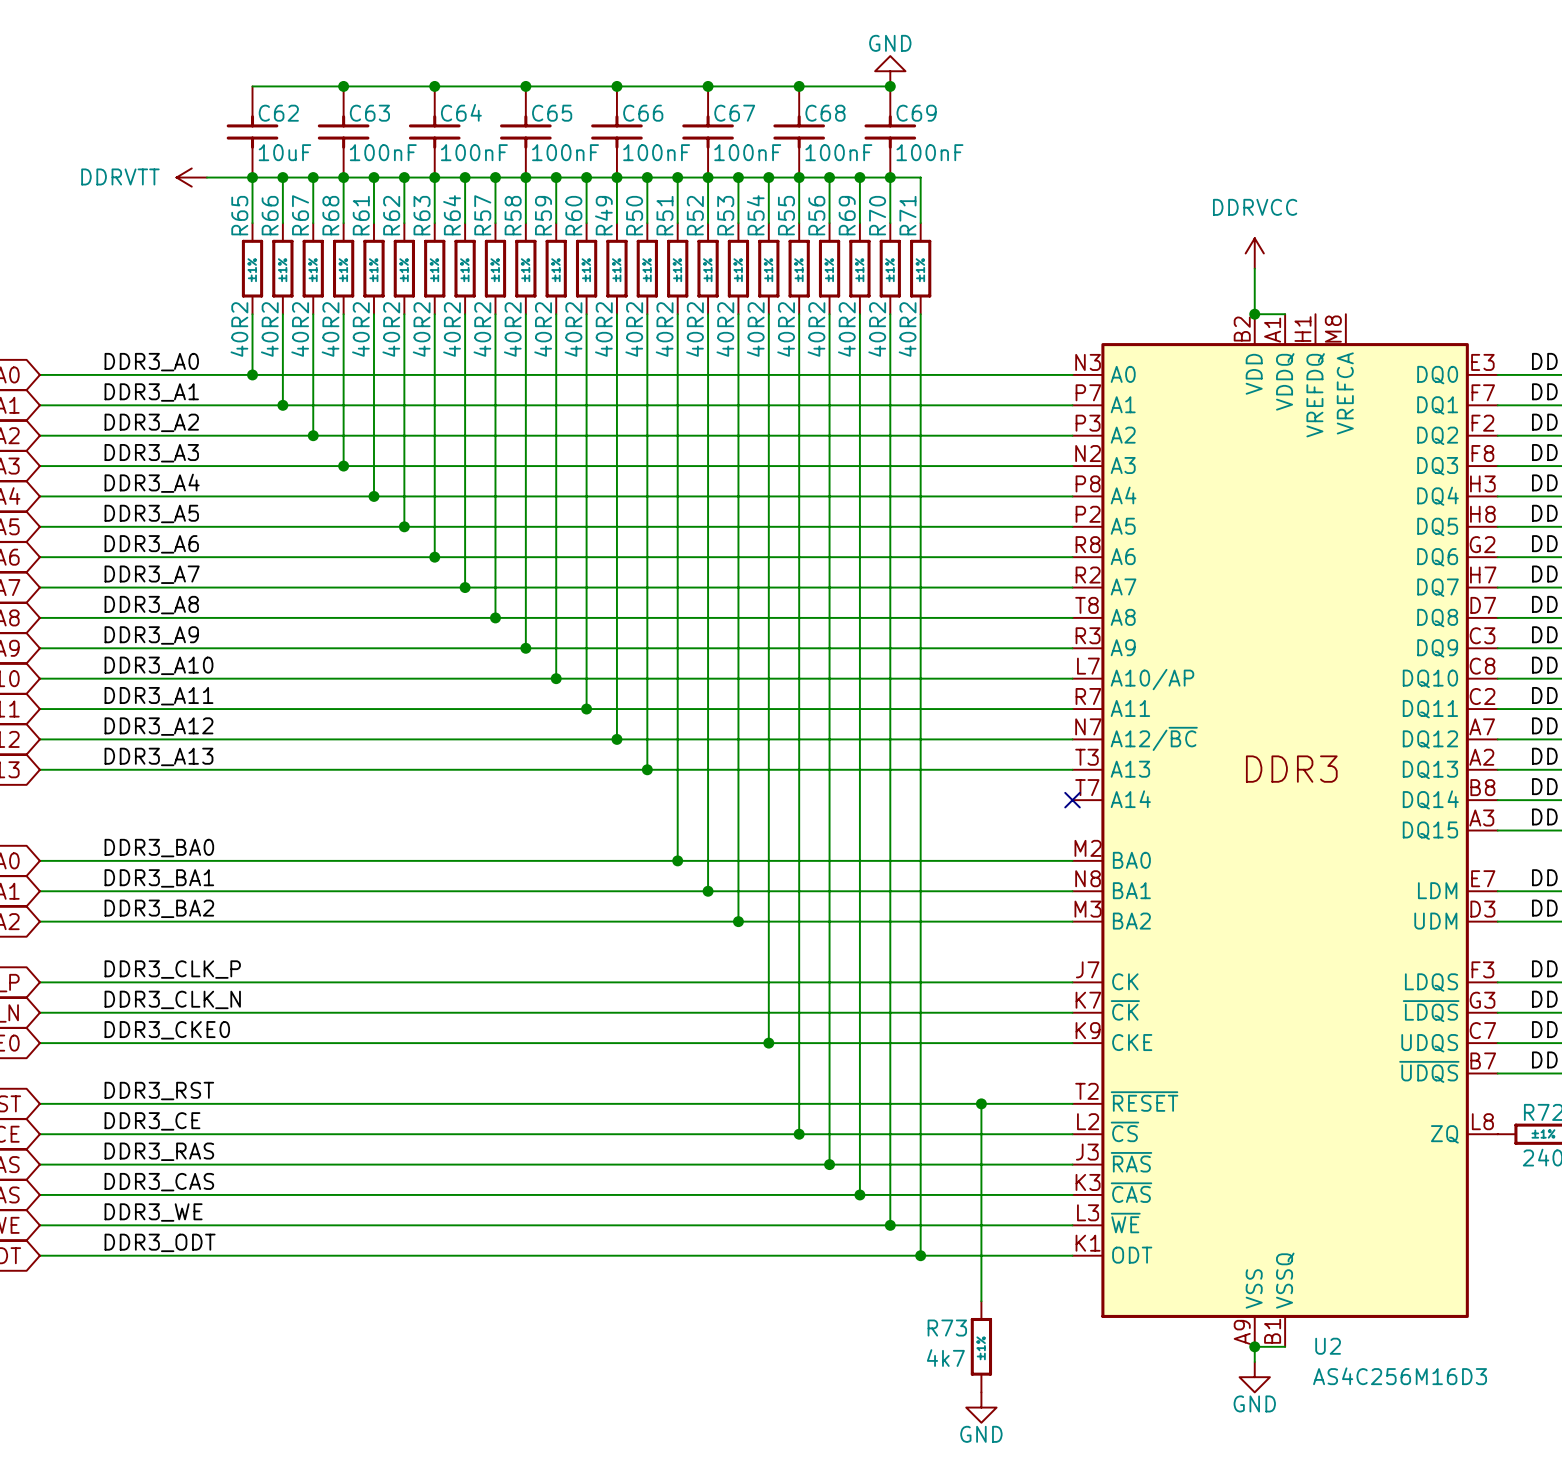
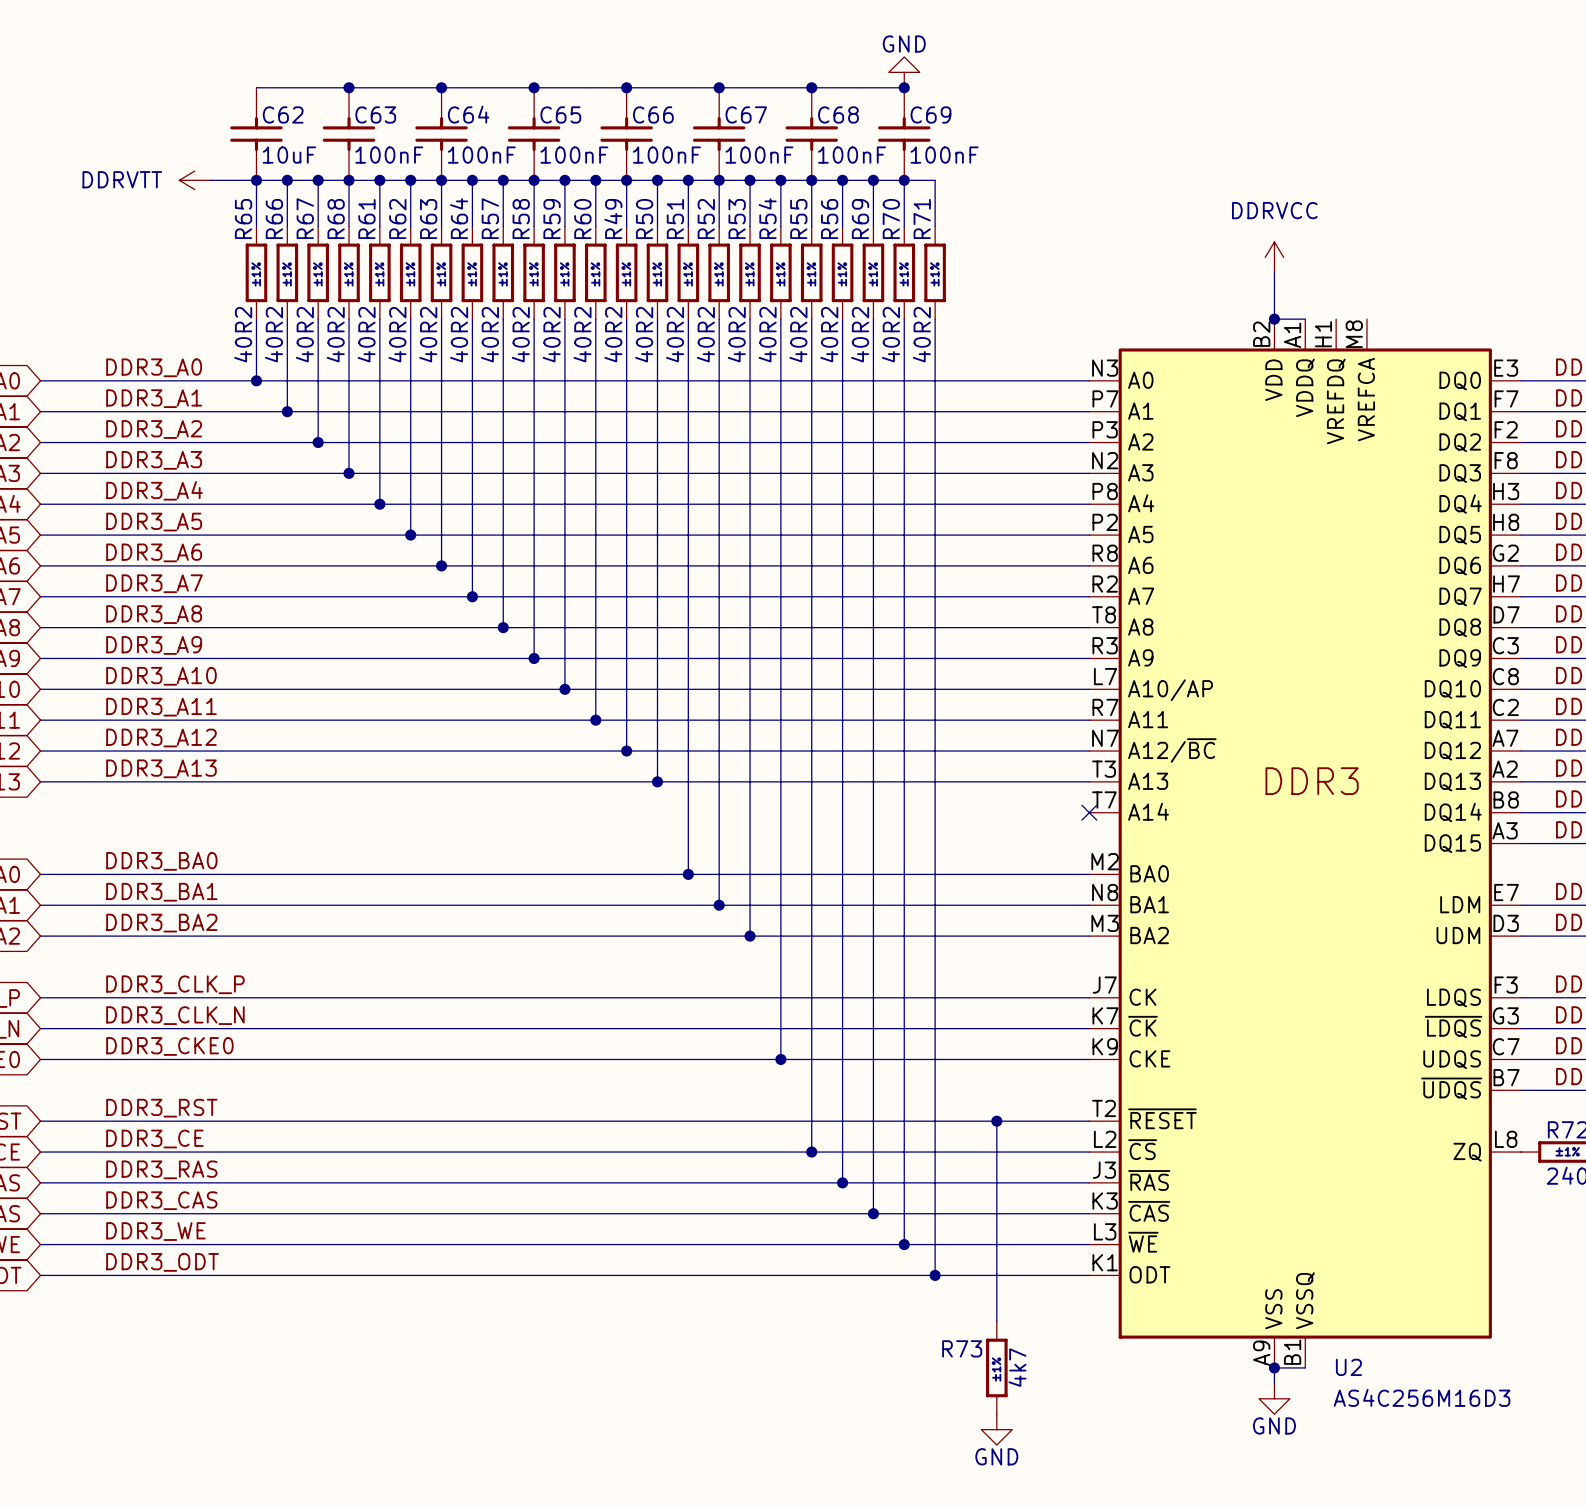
R73 text rotation: 0° (945, 1358) -> 90° counterclockwise (1017, 1367)
R73 text position: 4k7 (945, 1358) -> 4k7 (1017, 1367)

